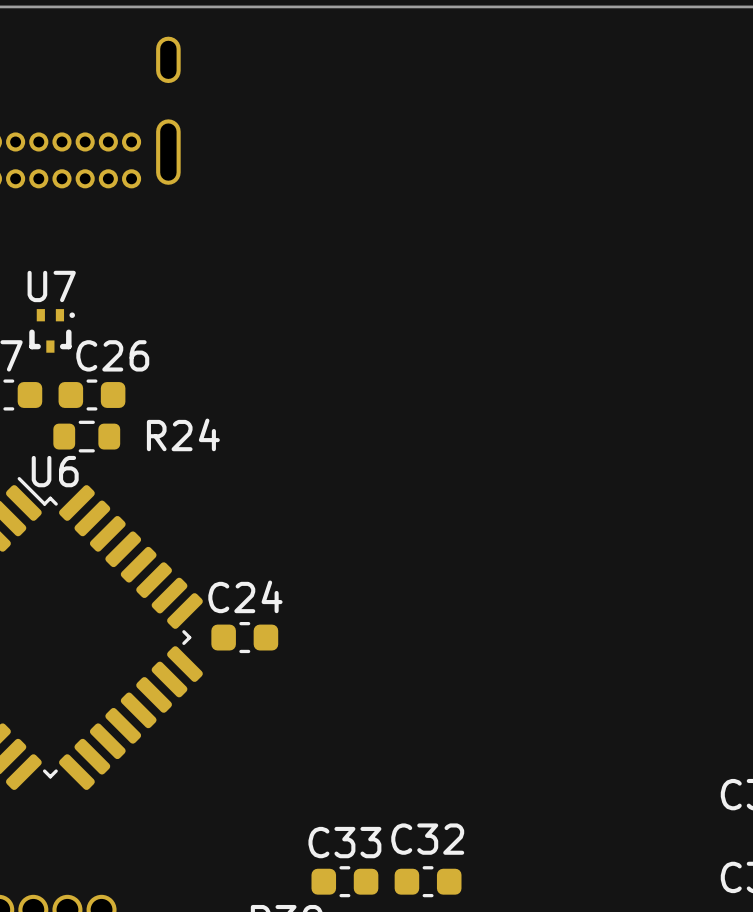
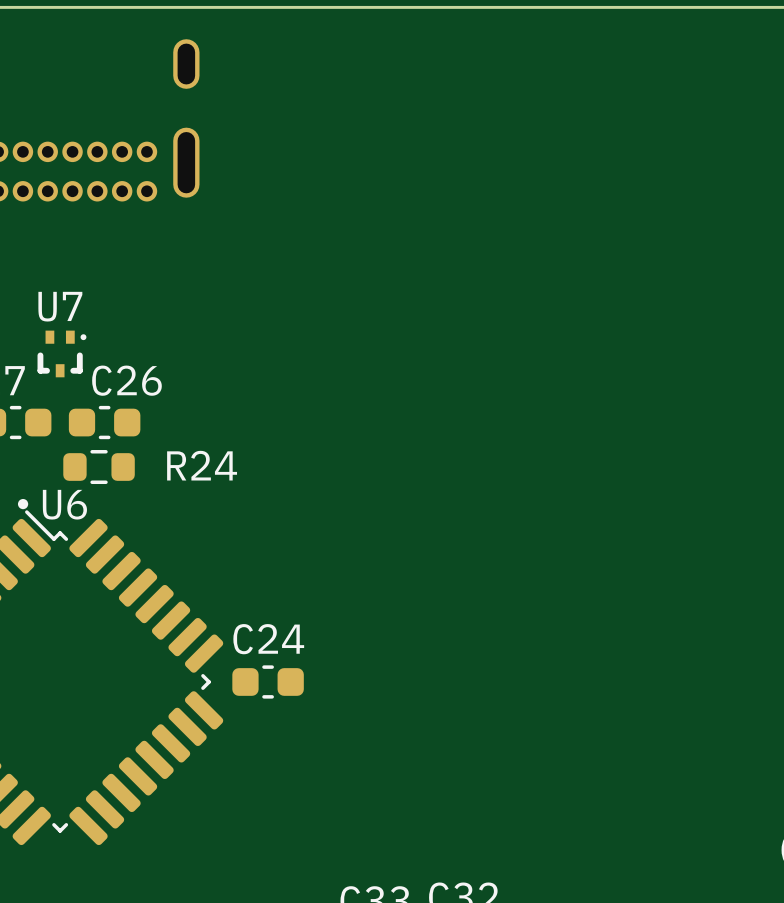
drawing: none -> [17, 498, 29, 510]

